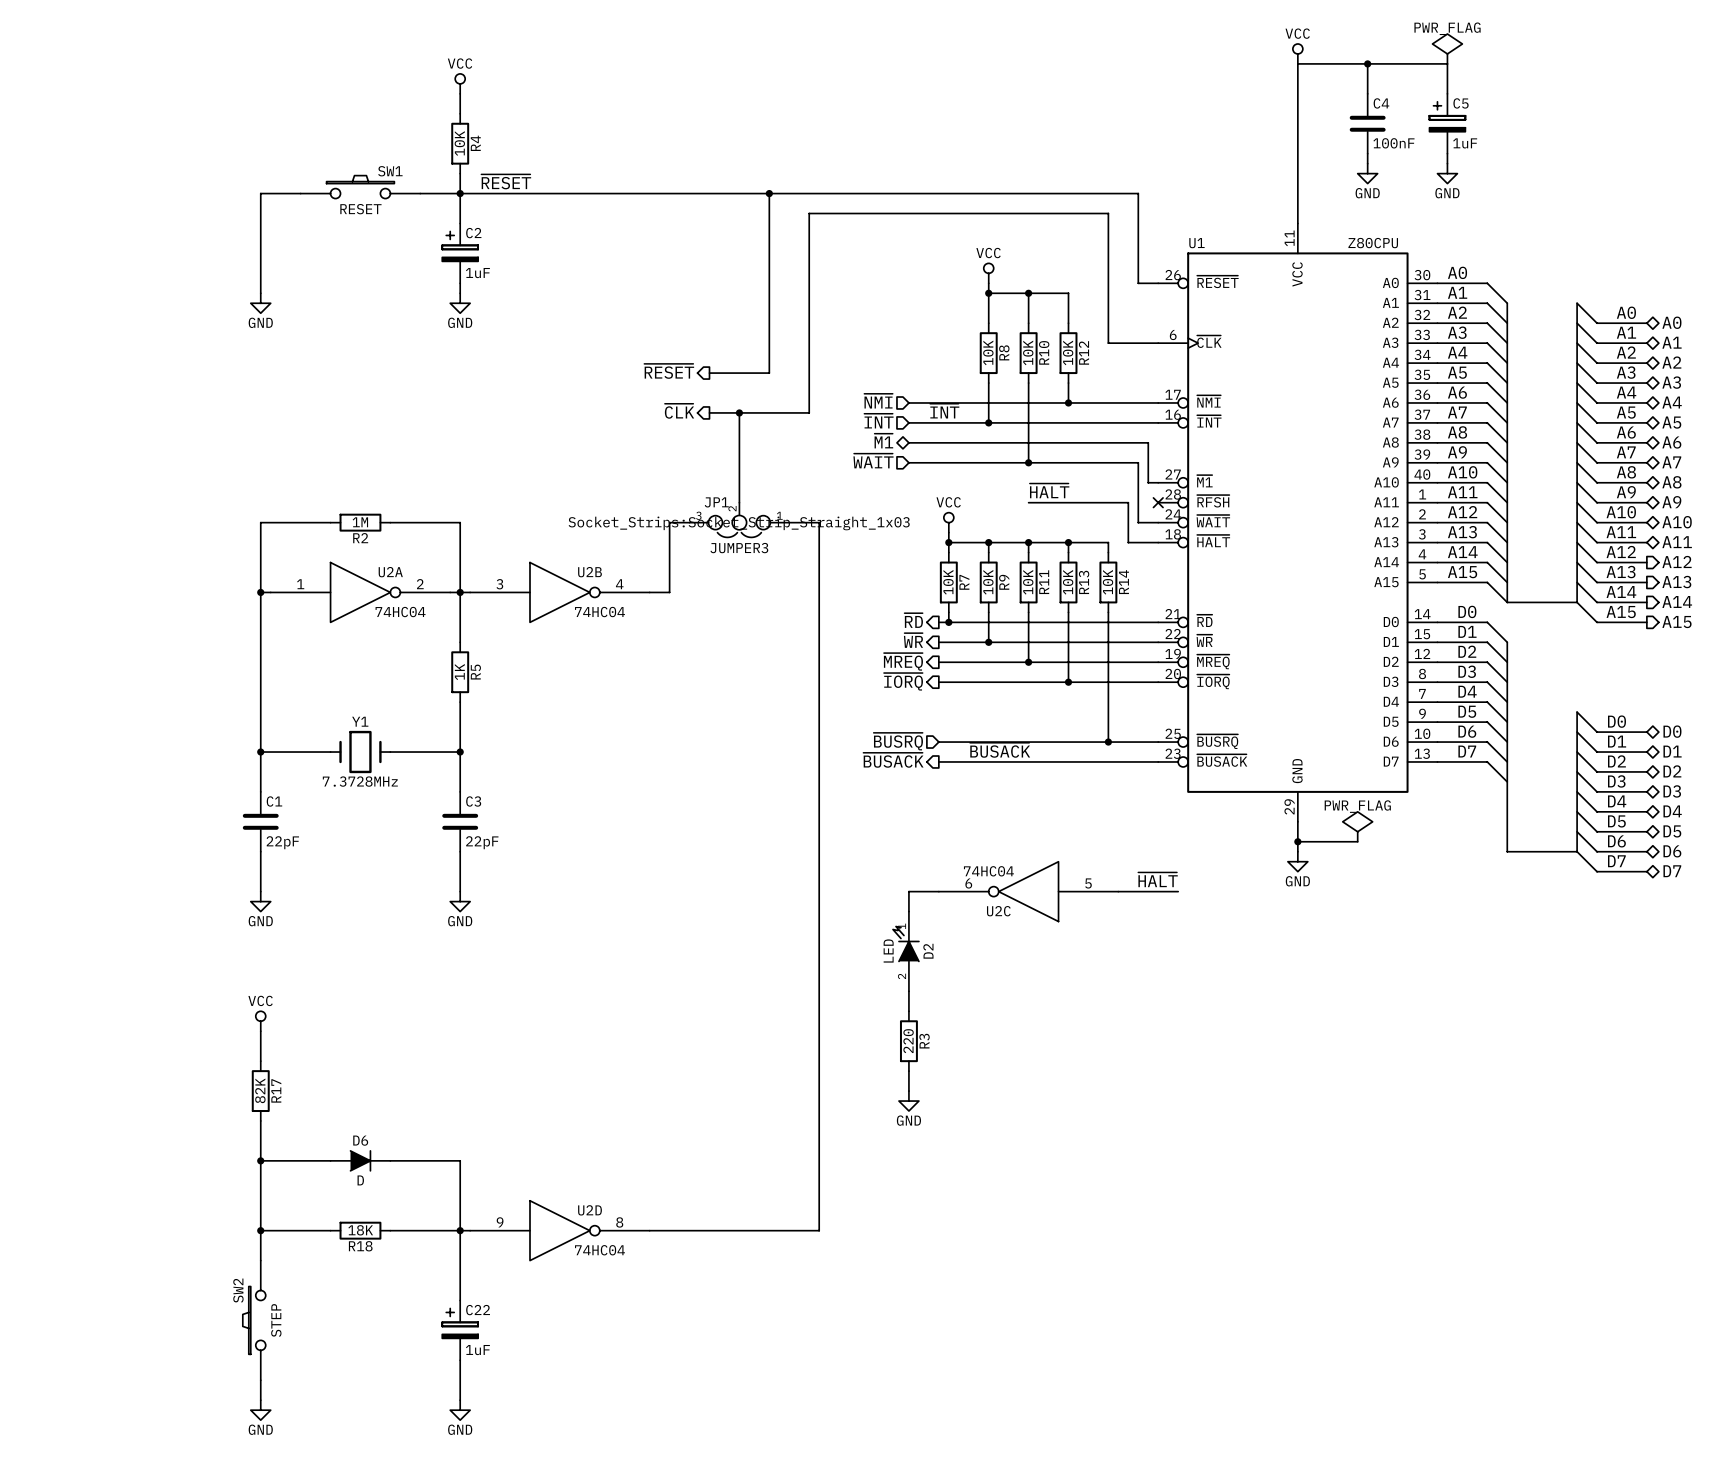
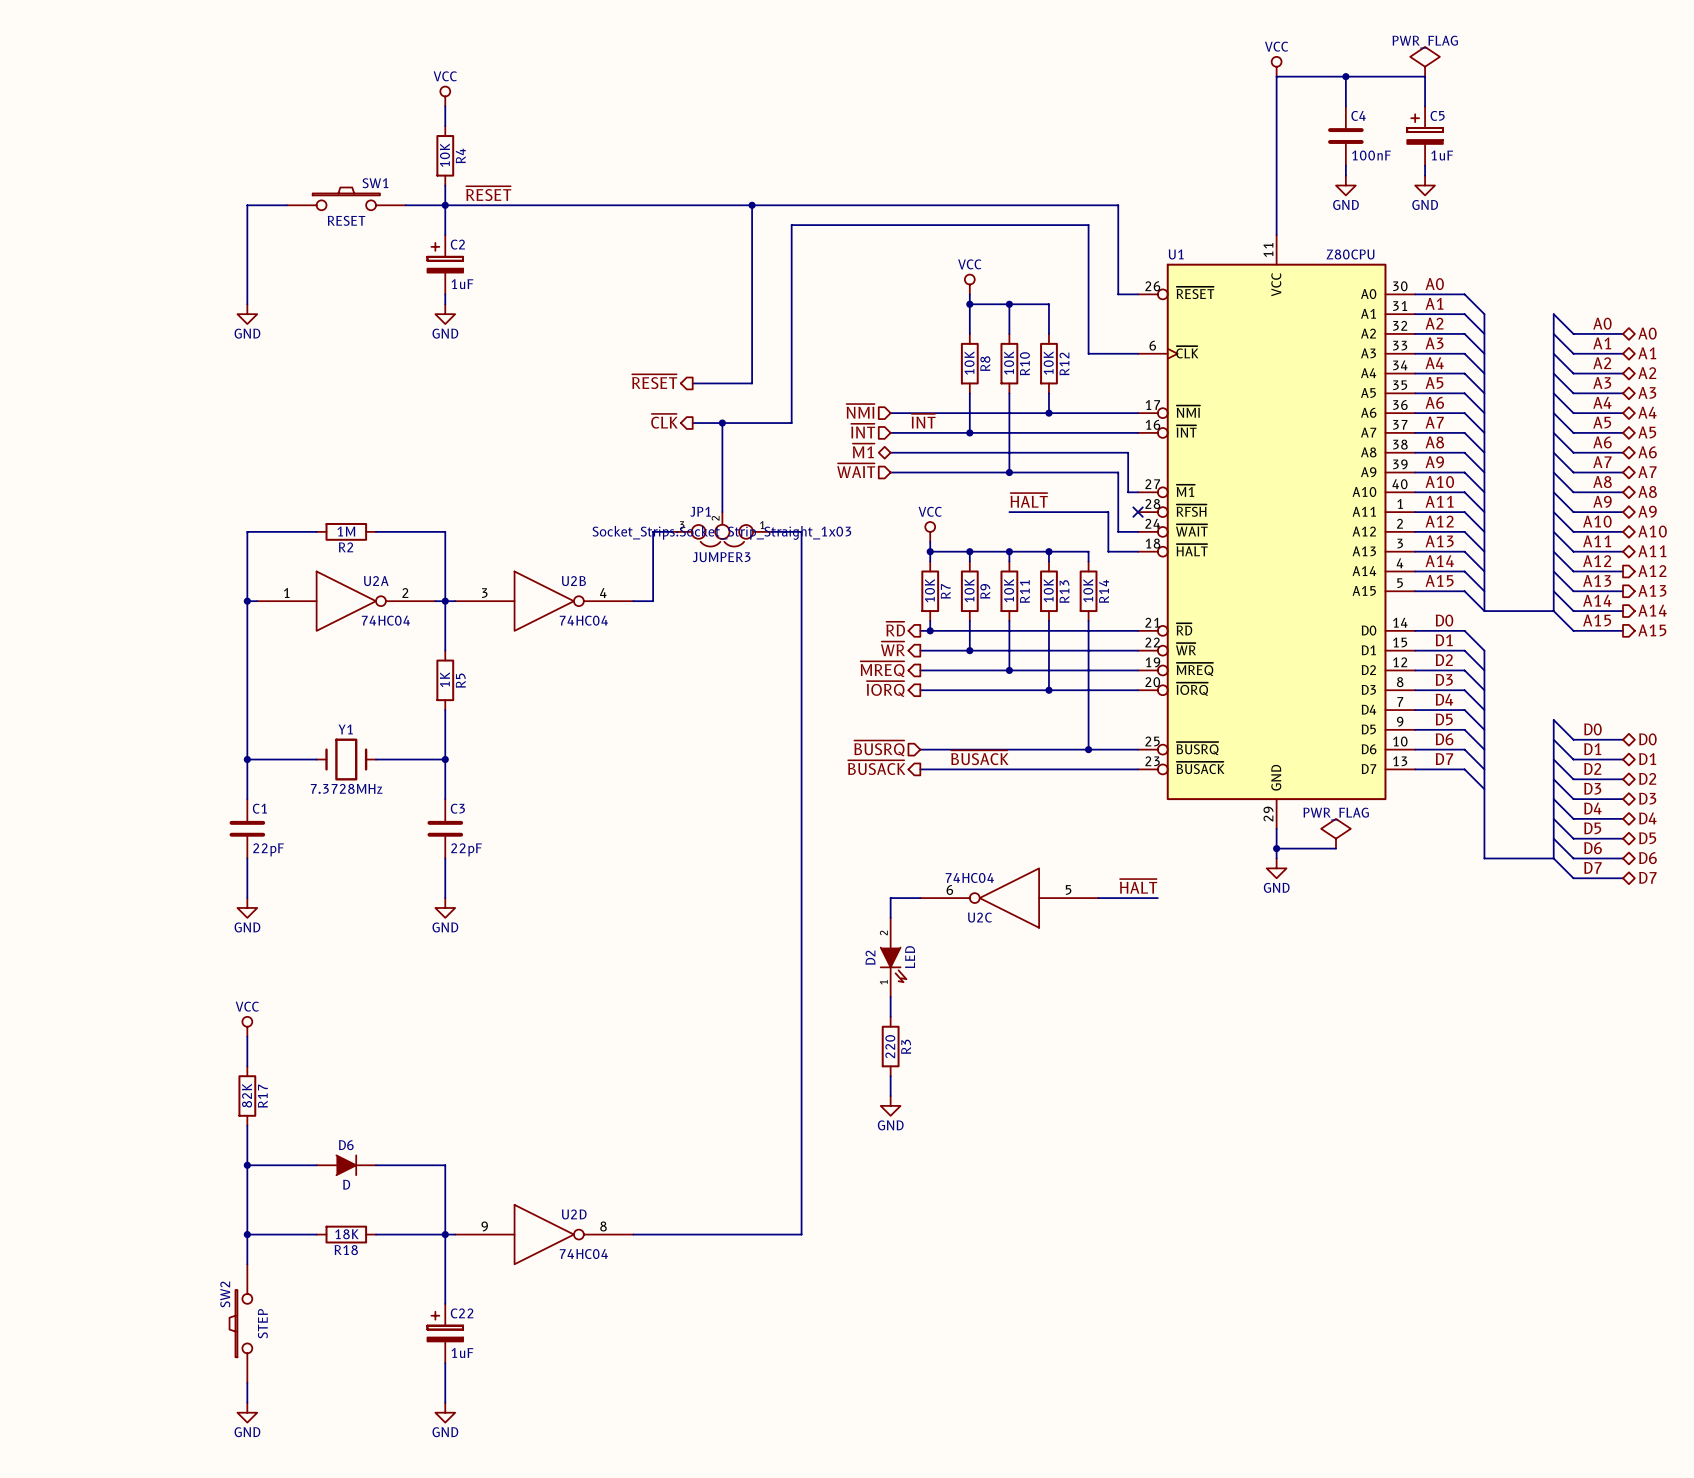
D2 rotation: 0° (905, 943) -> 180° (893, 964)

